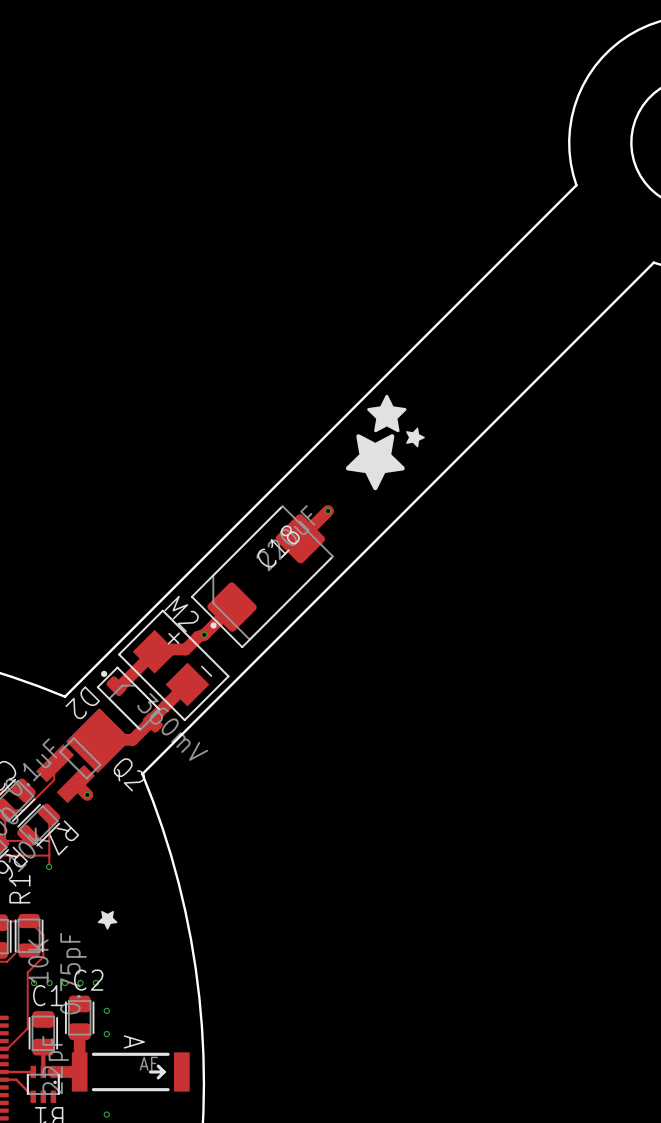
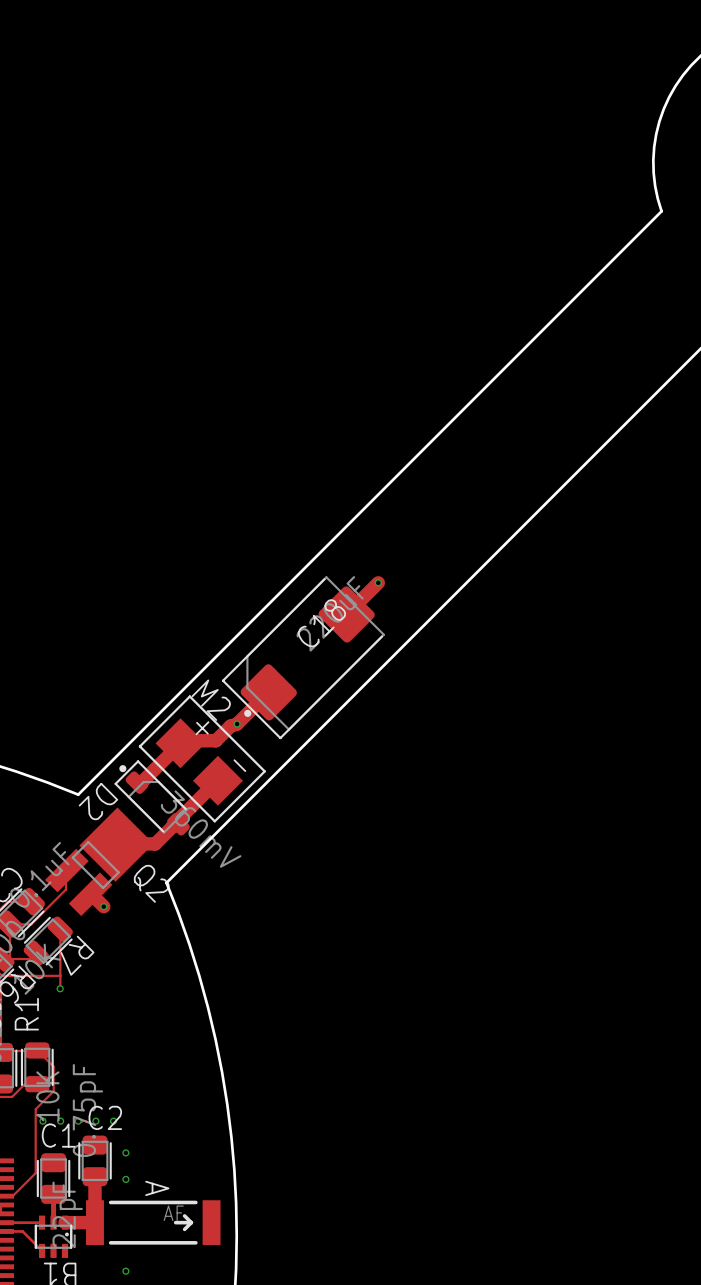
drawing: [345, 394, 425, 491] -> none
drawing: [97, 910, 118, 930] -> none

